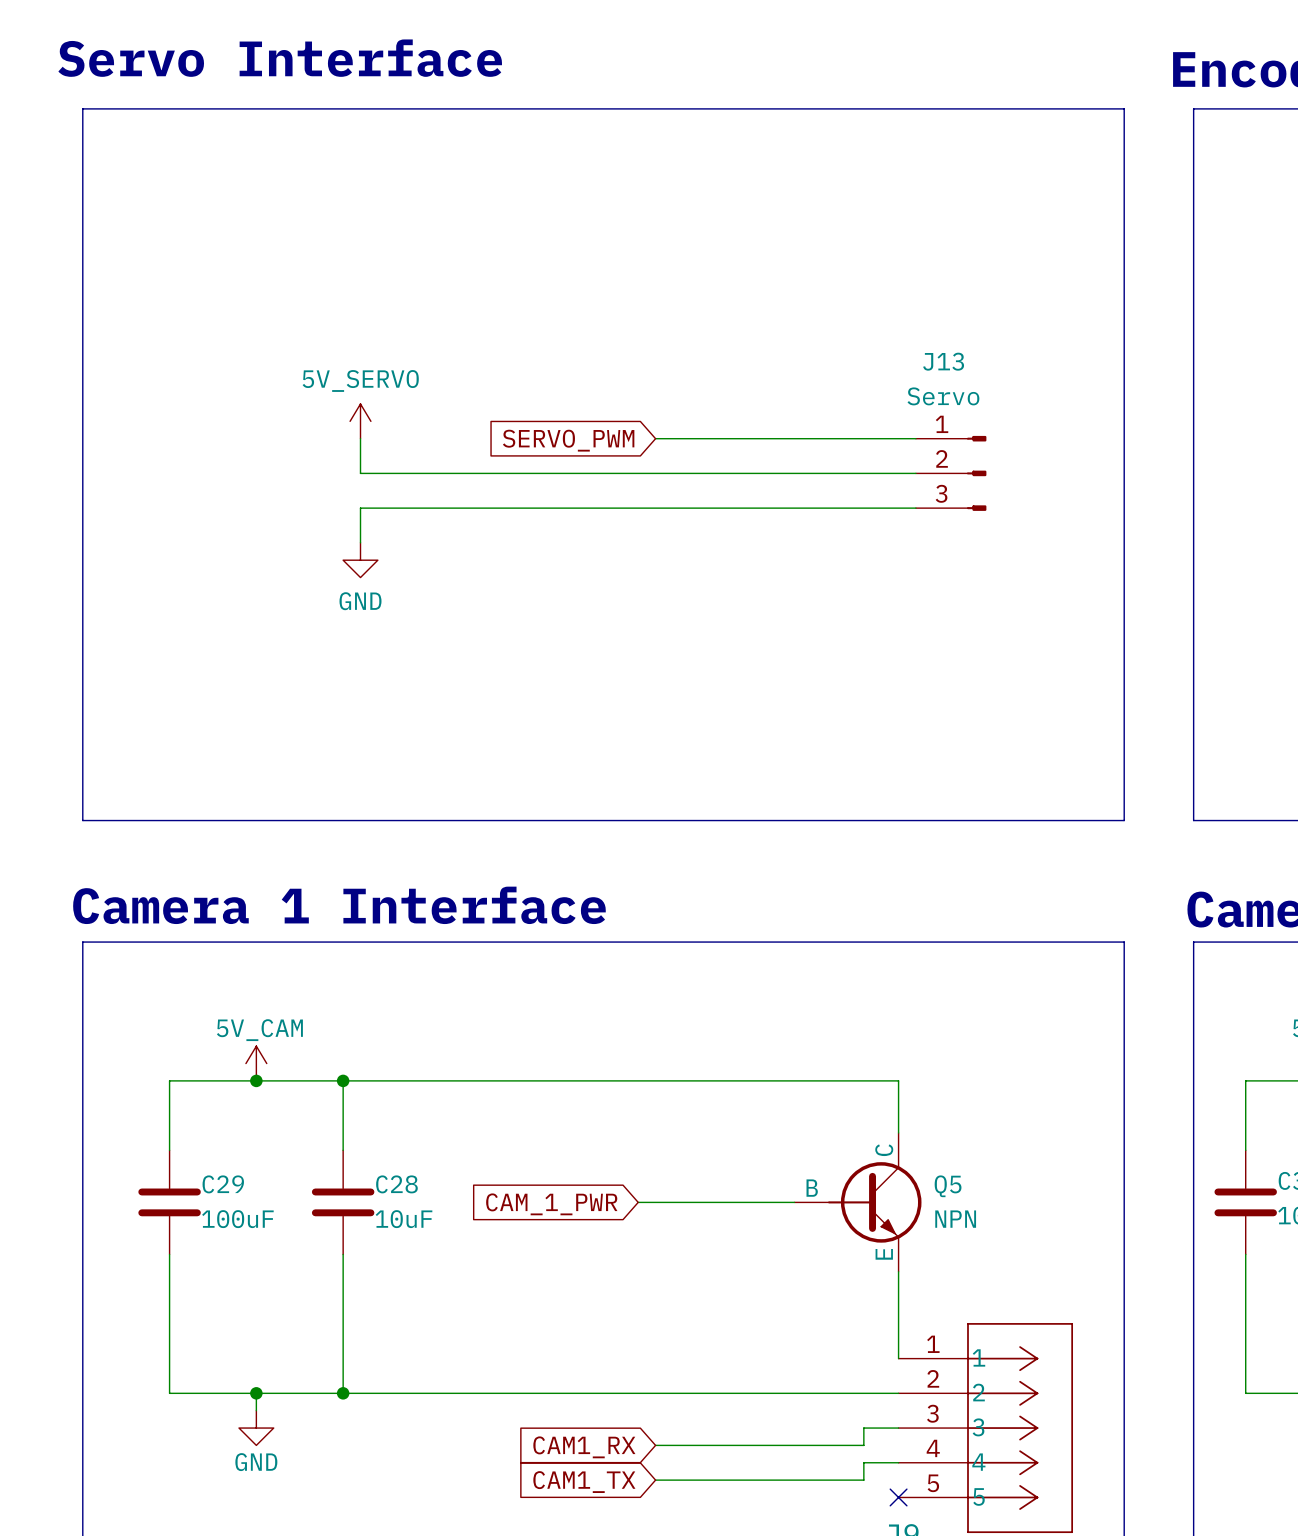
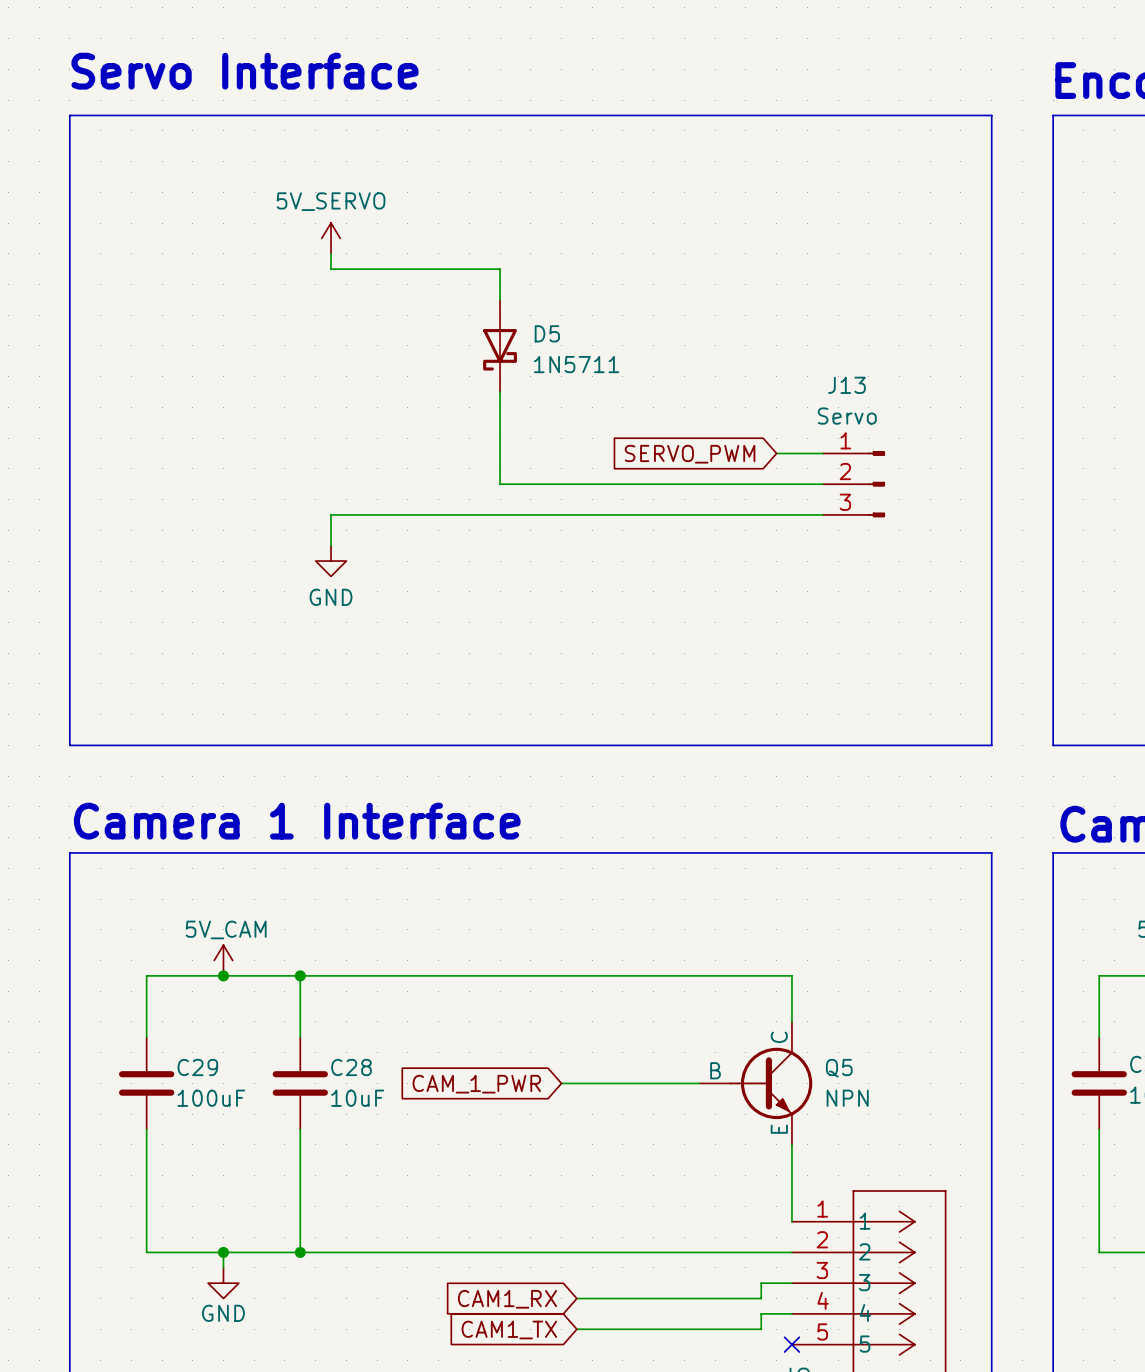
wire: none -> (331, 253) (331, 269) (500, 269) (500, 299)
D5: none -> 1N5711 (500, 345)
power symbol position: 5V_SERVO (360, 421) -> 5V_SERVO (331, 238)
wire: none -> (500, 392) (500, 484) (822, 484)
wire: (360, 438) (360, 473) (915, 473) -> none
wire: (655, 438) (915, 438) -> none
global label position: SERVO_PWM (568, 440) -> SERVO_PWM (690, 454)
J13 position: (951, 473) -> (853, 484)
wire: none -> (776, 453) (822, 453)
wire: (915, 508) (360, 508) (360, 542) -> (822, 514) (331, 514) (331, 545)
power symbol position: GND (360, 560) -> GND (331, 561)

